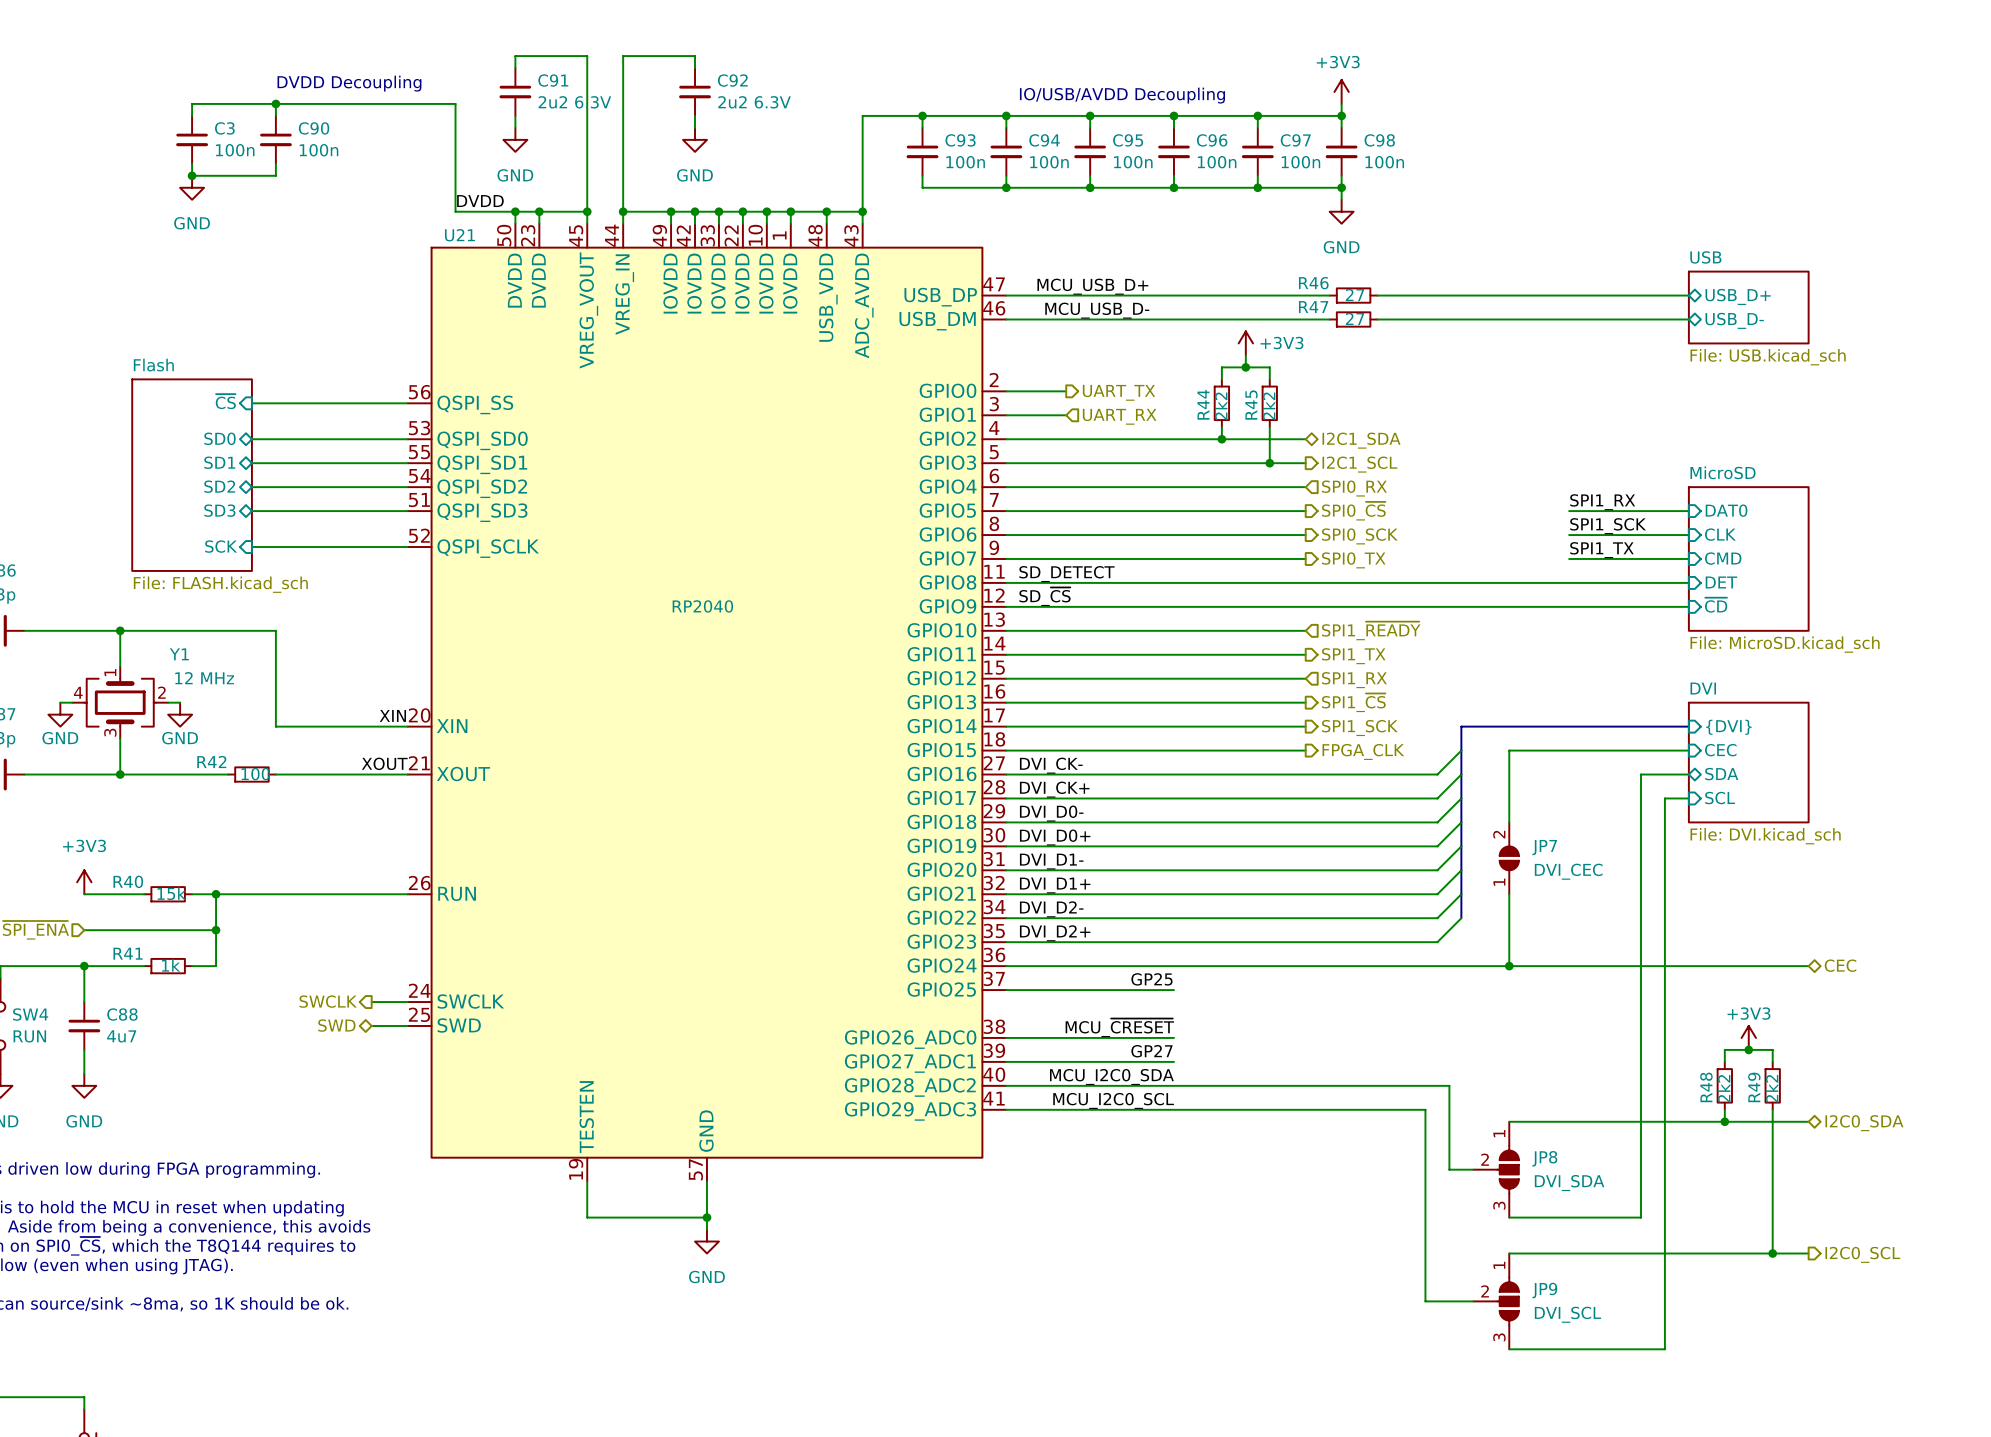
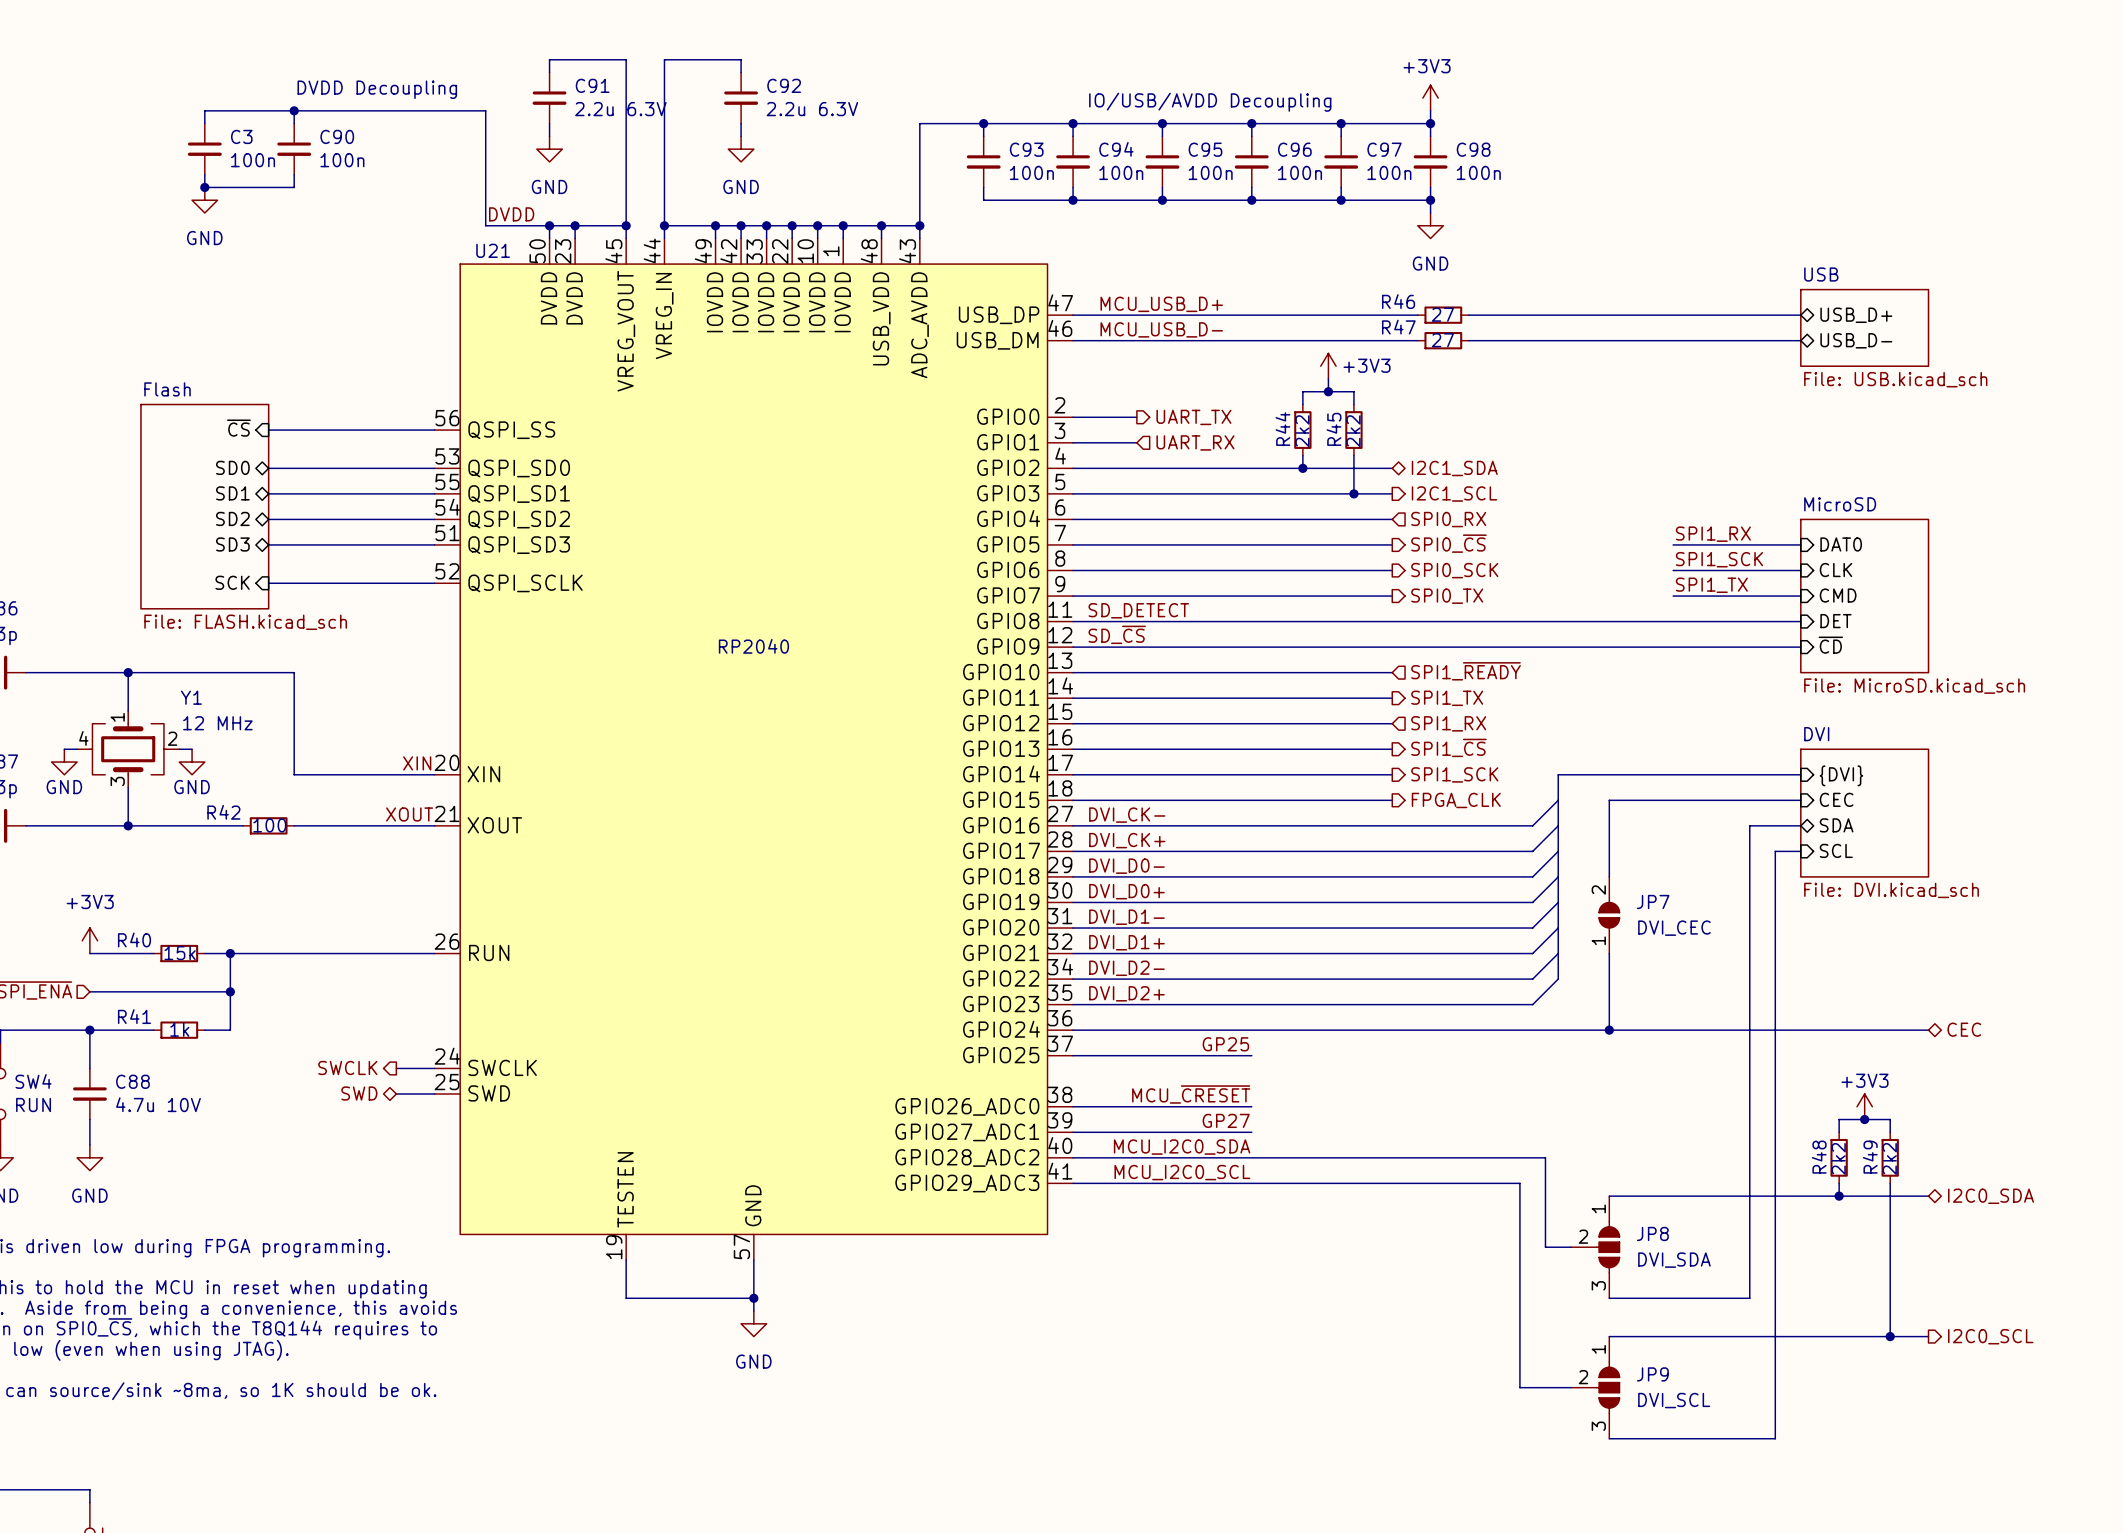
C91 value: 2u2 6.3V (574, 102) -> 2.2u 6.3V (620, 109)
C92 value: 2u2 6.3V (754, 102) -> 2.2u 6.3V (812, 109)
C88 value: 4u7 (121, 1036) -> 4.7u 10V (158, 1104)

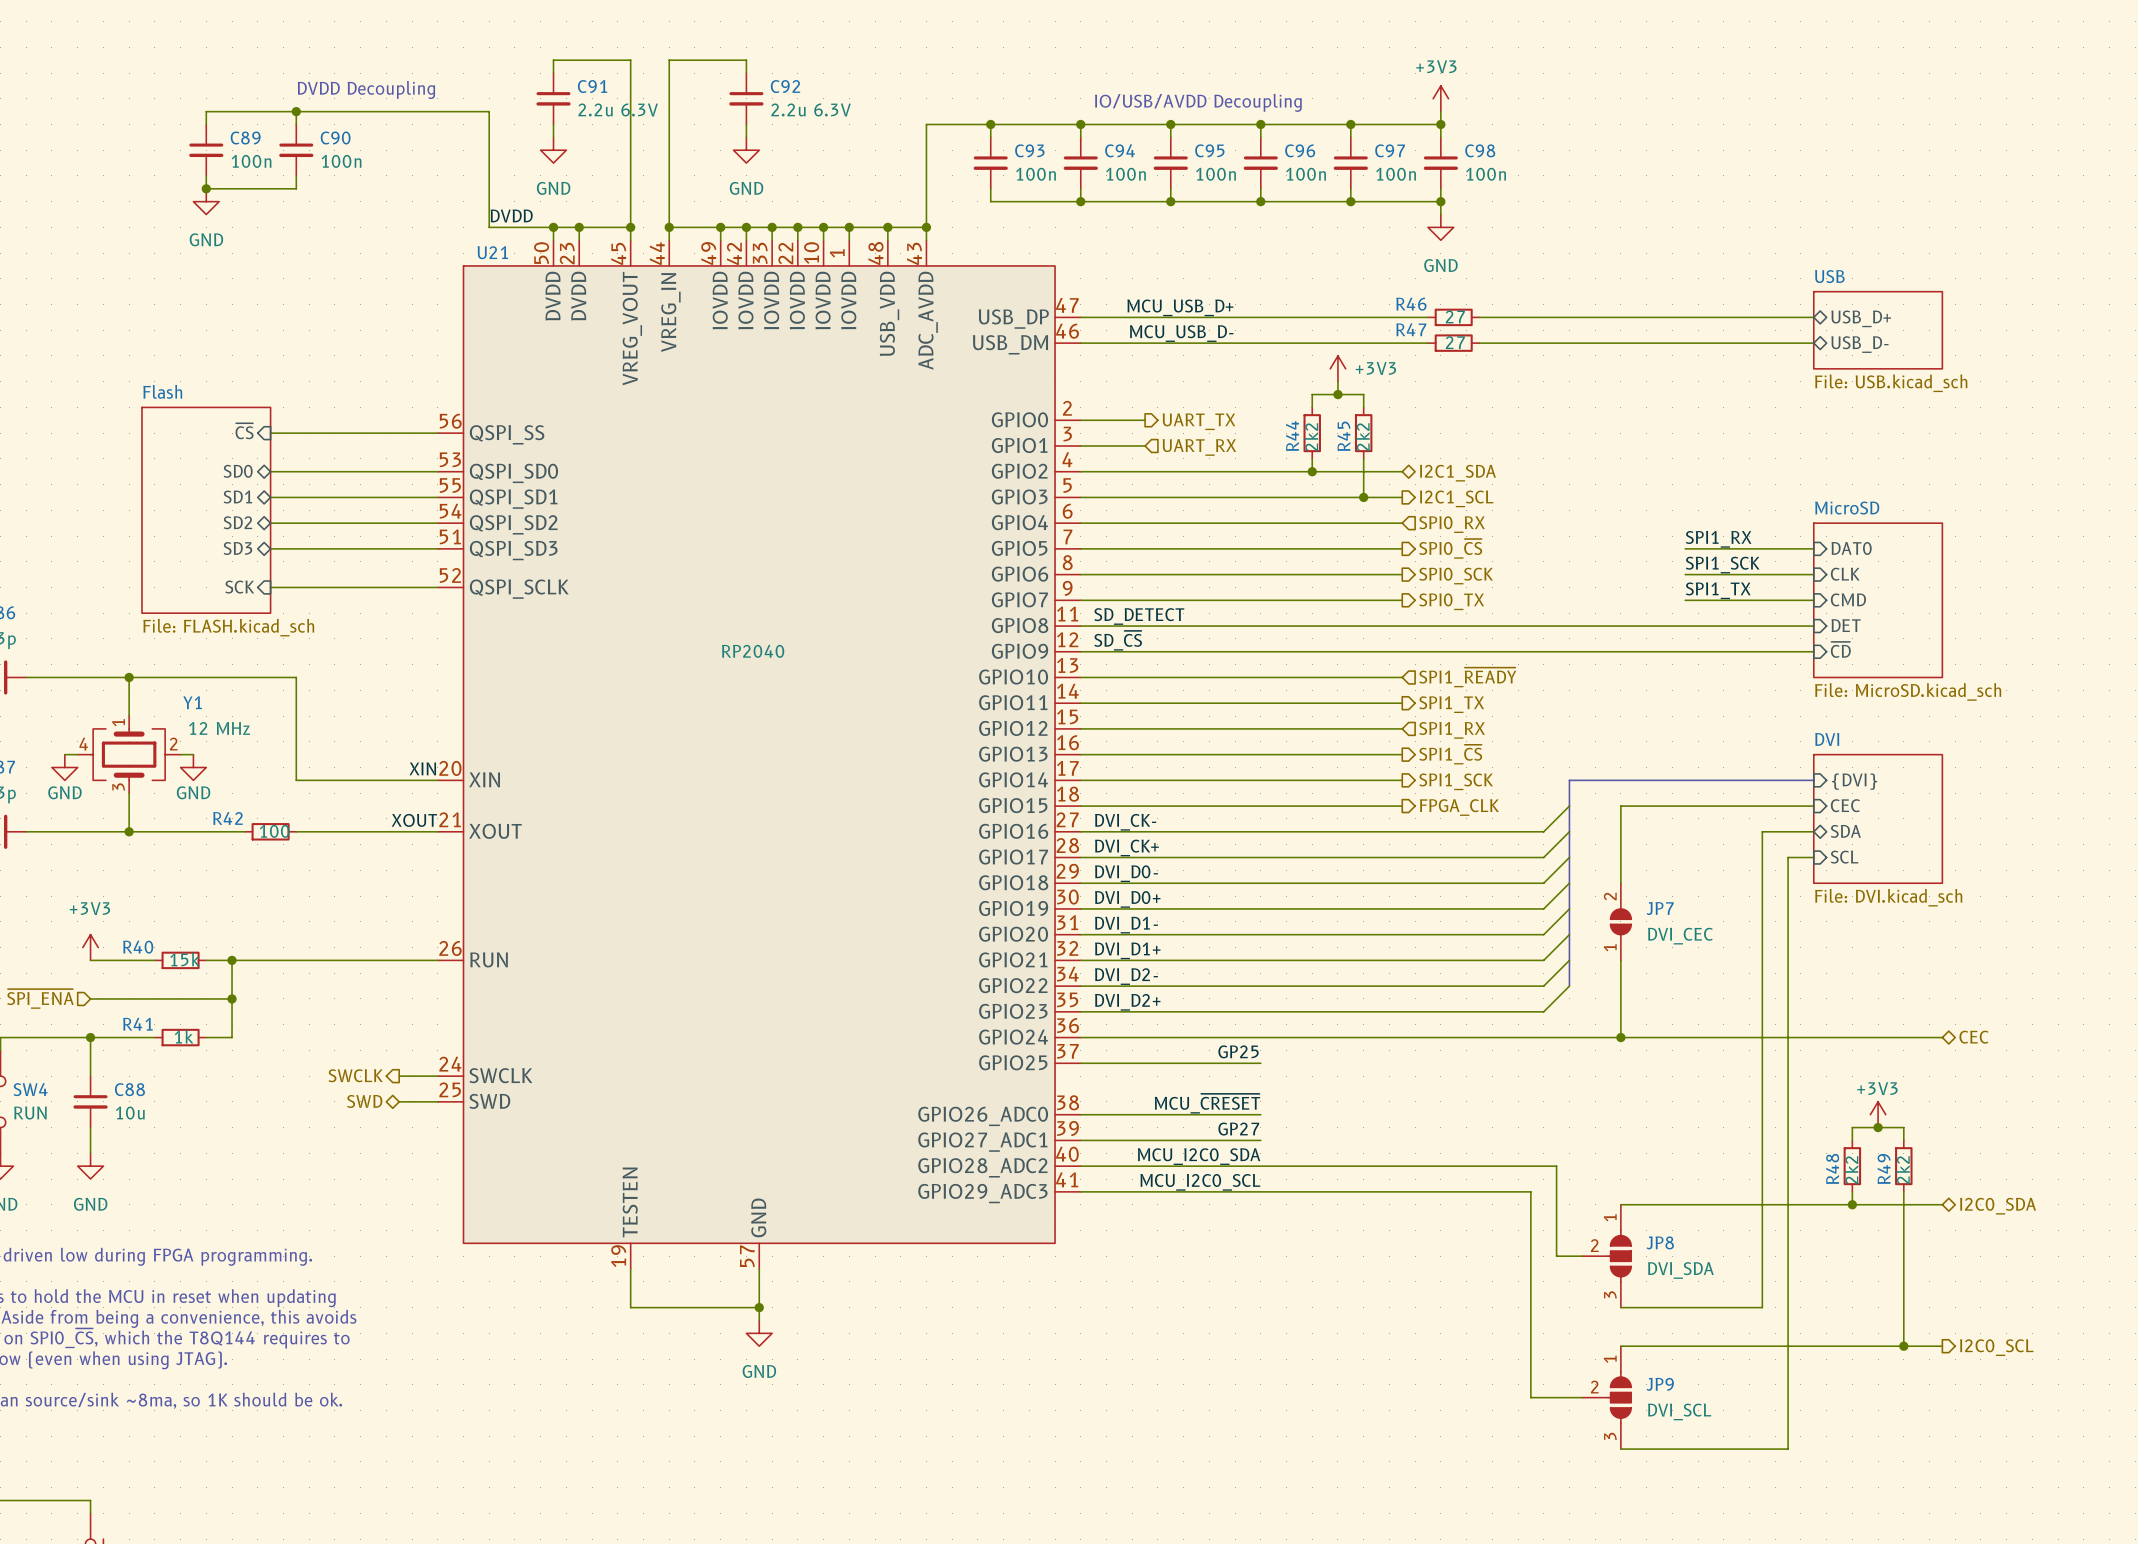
C3 name: C3 (241, 136) -> C89 (245, 137)
C88 value: 4.7u 10V (158, 1104) -> 10u (130, 1113)

